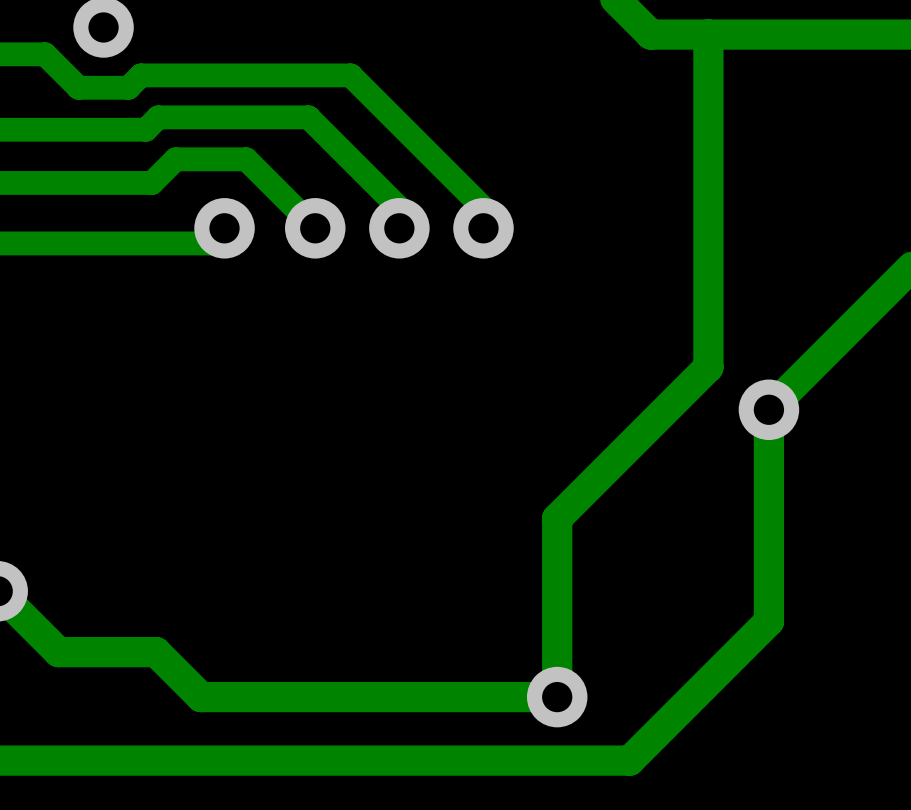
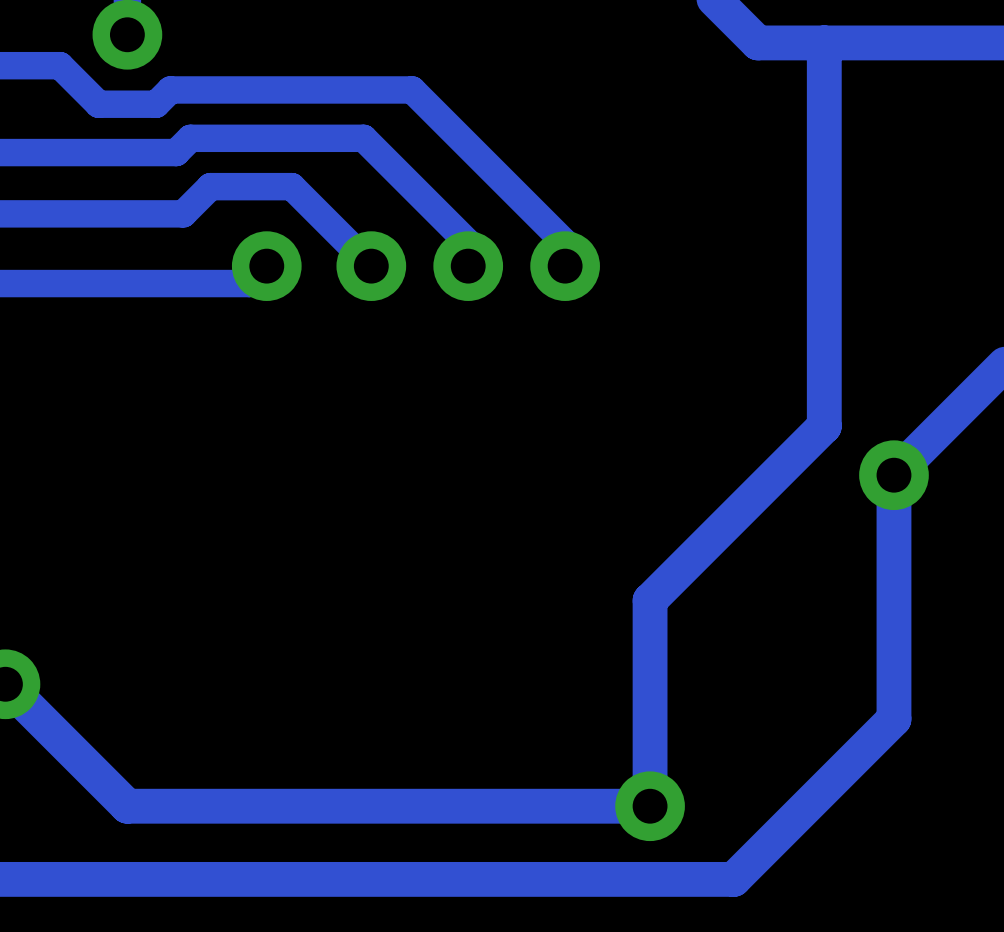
track: (58, 652) (156, 652) (201, 697) -> (75, 754) (127, 806) (239, 806)

